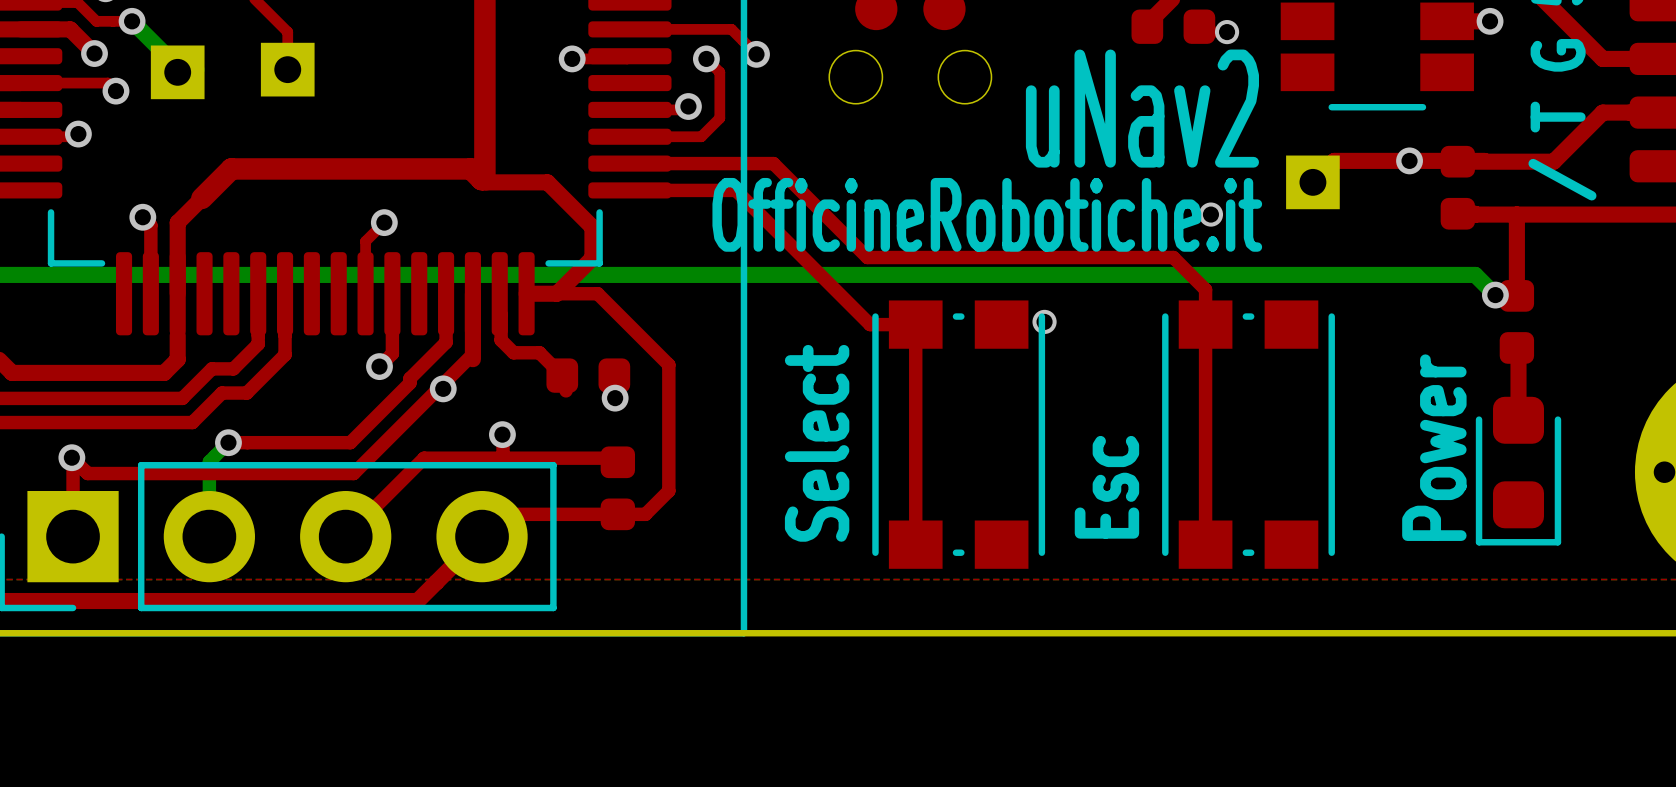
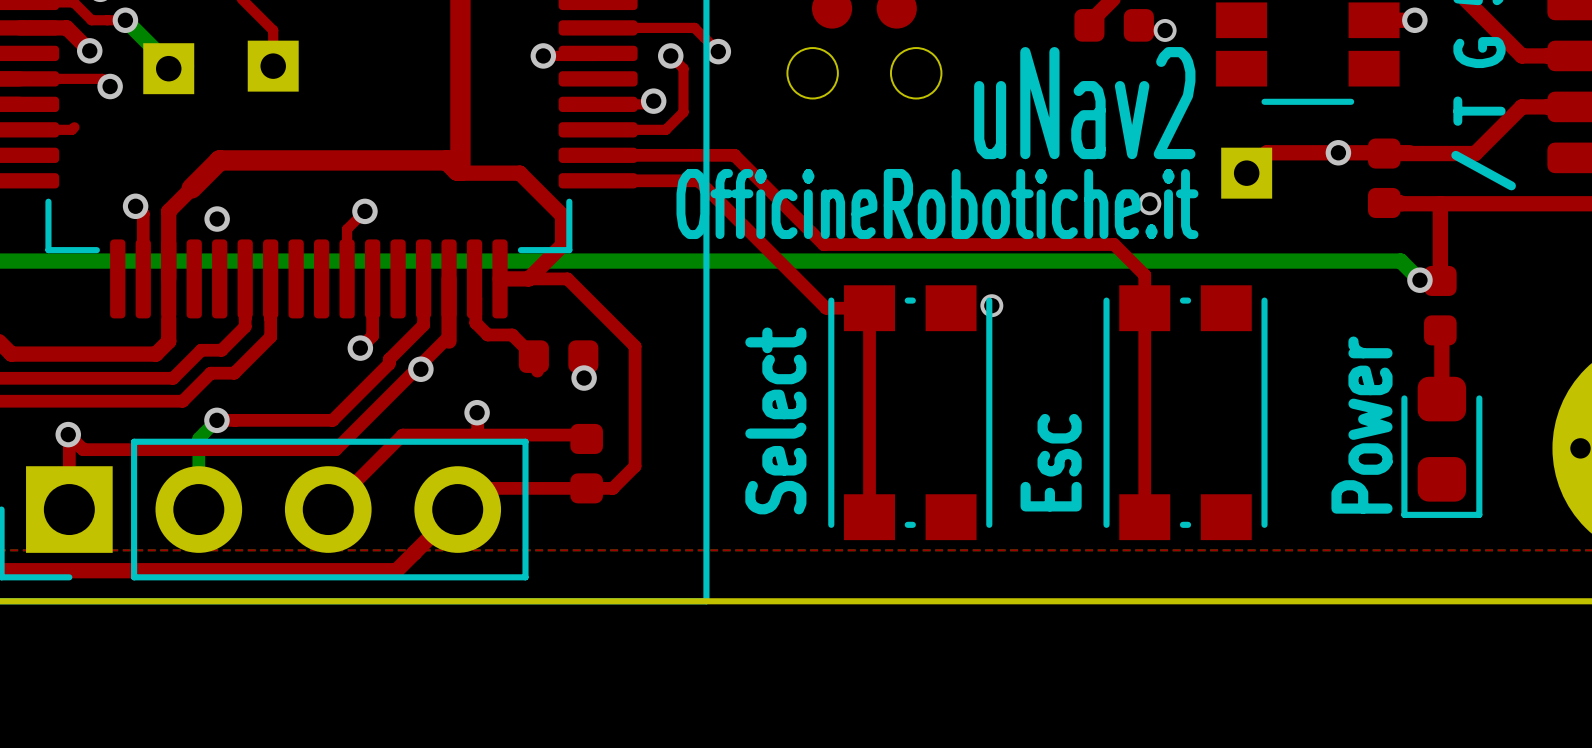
via position: (78, 134) -> (217, 219)

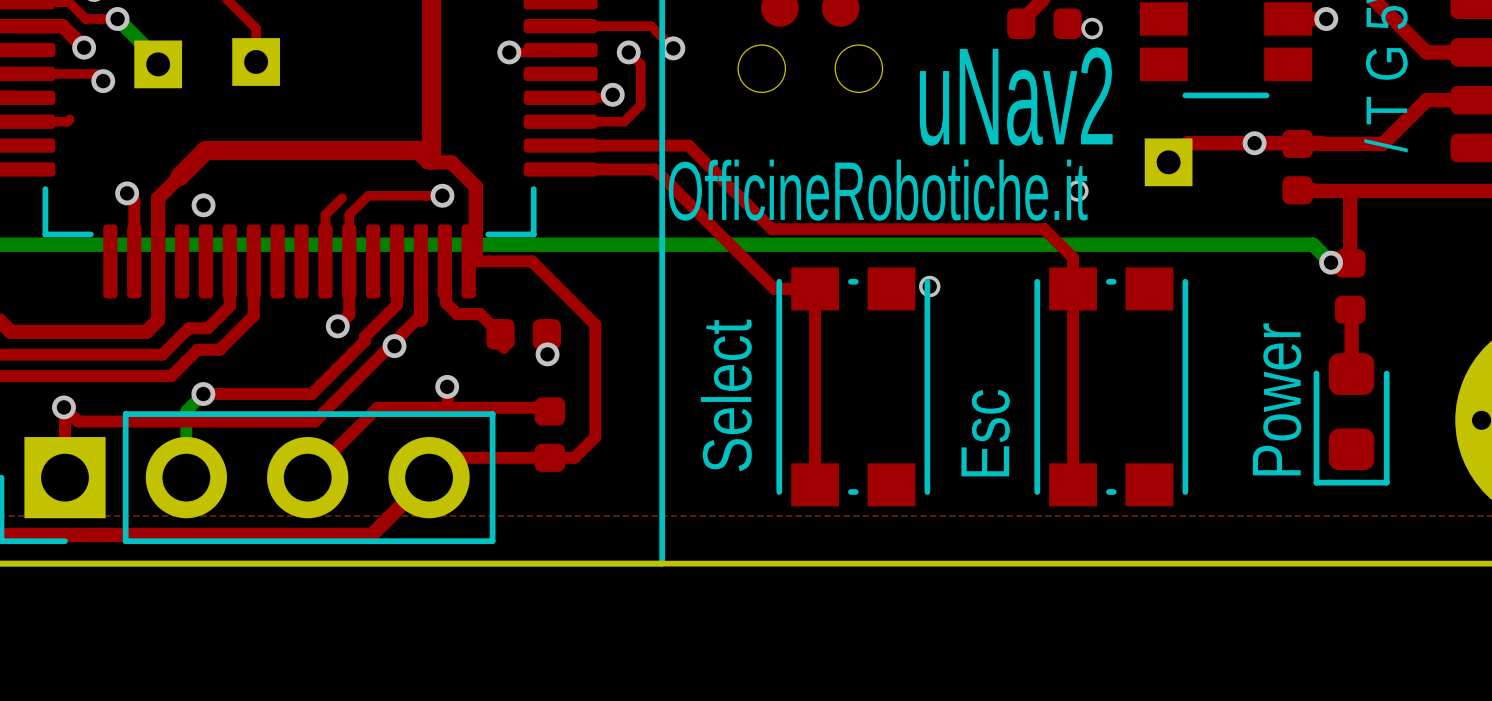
top track: (481, 173) (519, 173) (562, 215) (562, 245) (528, 278) (500, 278) -> (451, 162) (475, 186) (475, 254) (468, 261)
top track: none -> (442, 195) (368, 195) (349, 214) (349, 261)
via position: (364, 211) -> (442, 195)

